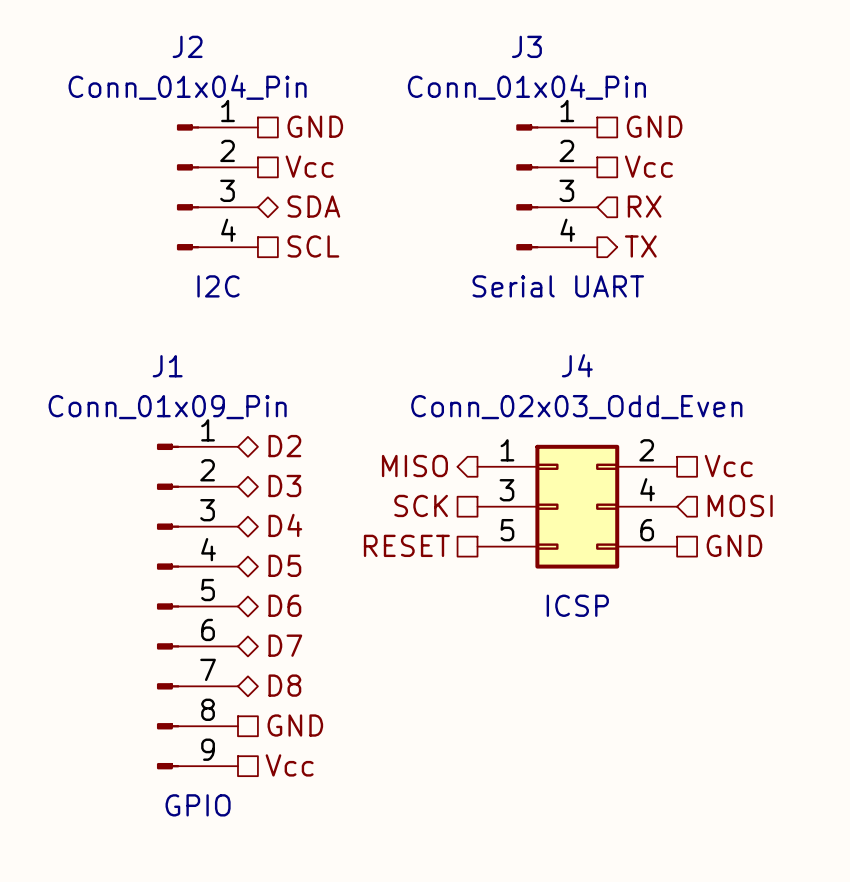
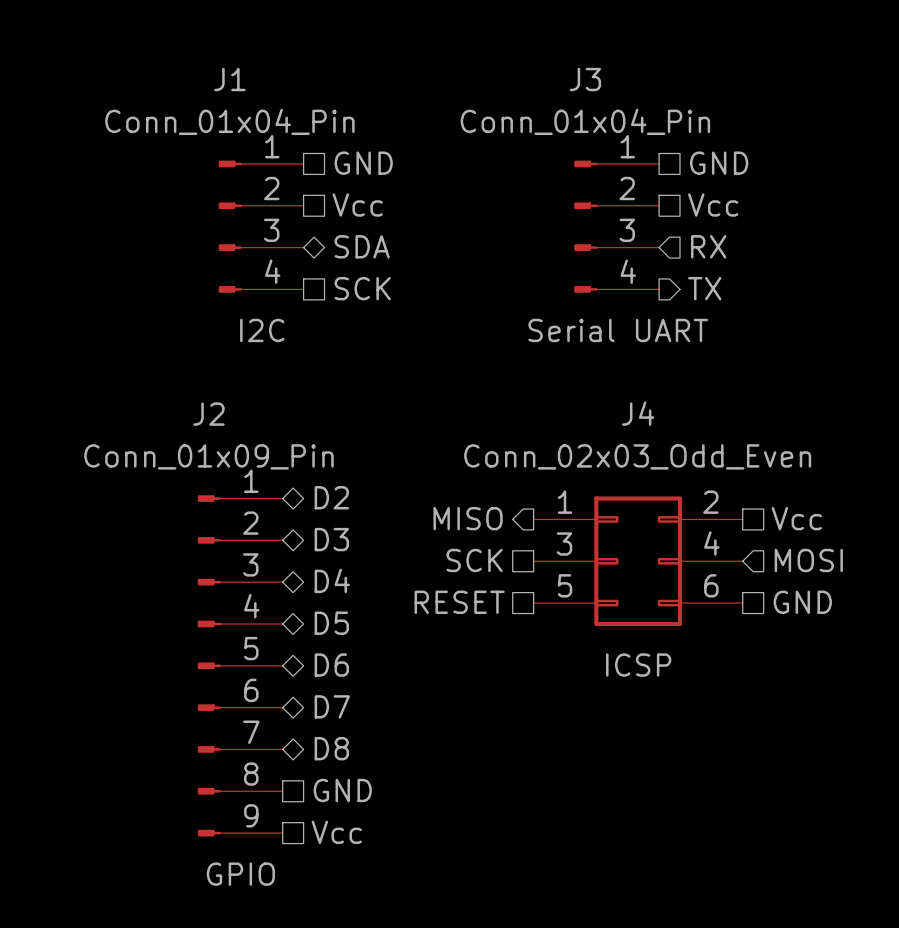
J2 name: J2 (187, 46) -> J1 (229, 79)
hierarchical label: SCL (313, 246) -> SCK (362, 288)
J1 name: J1 (167, 366) -> J2 (209, 414)

